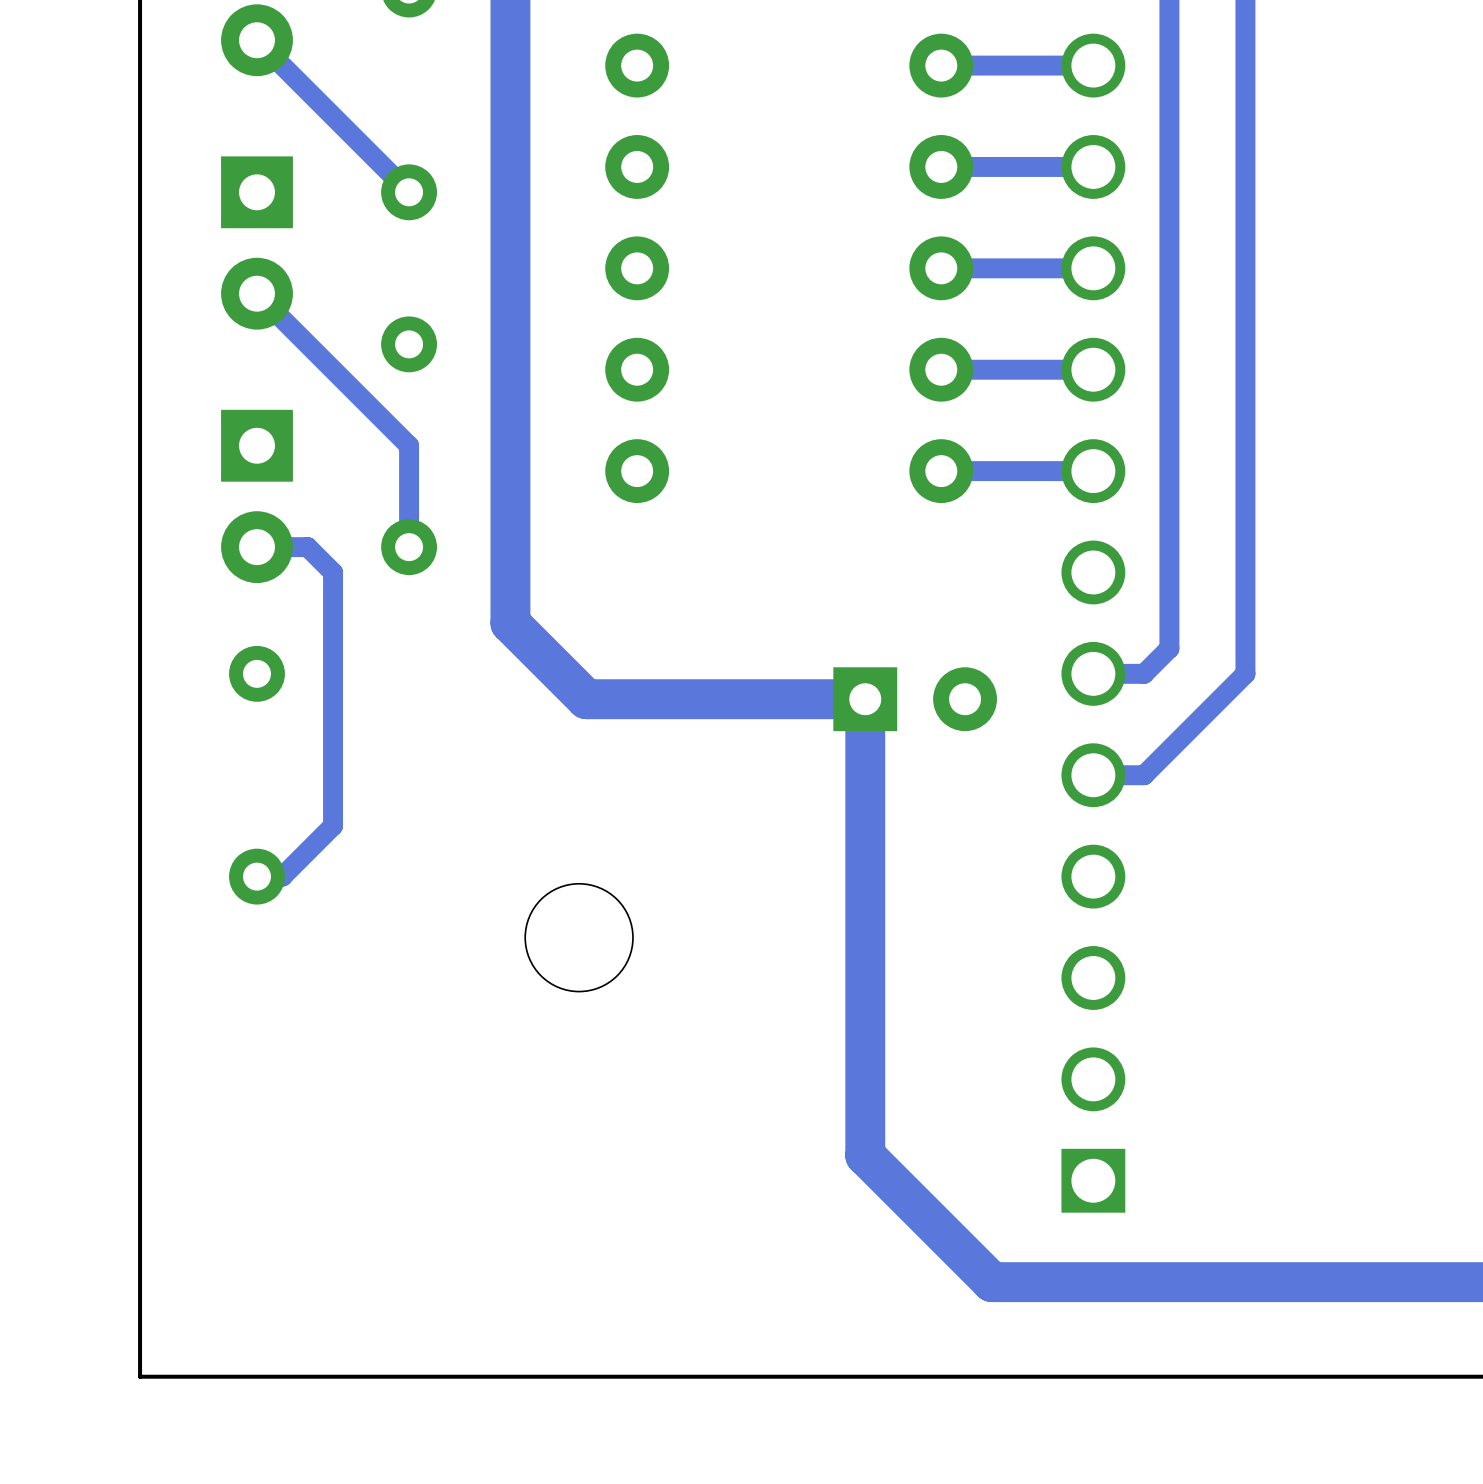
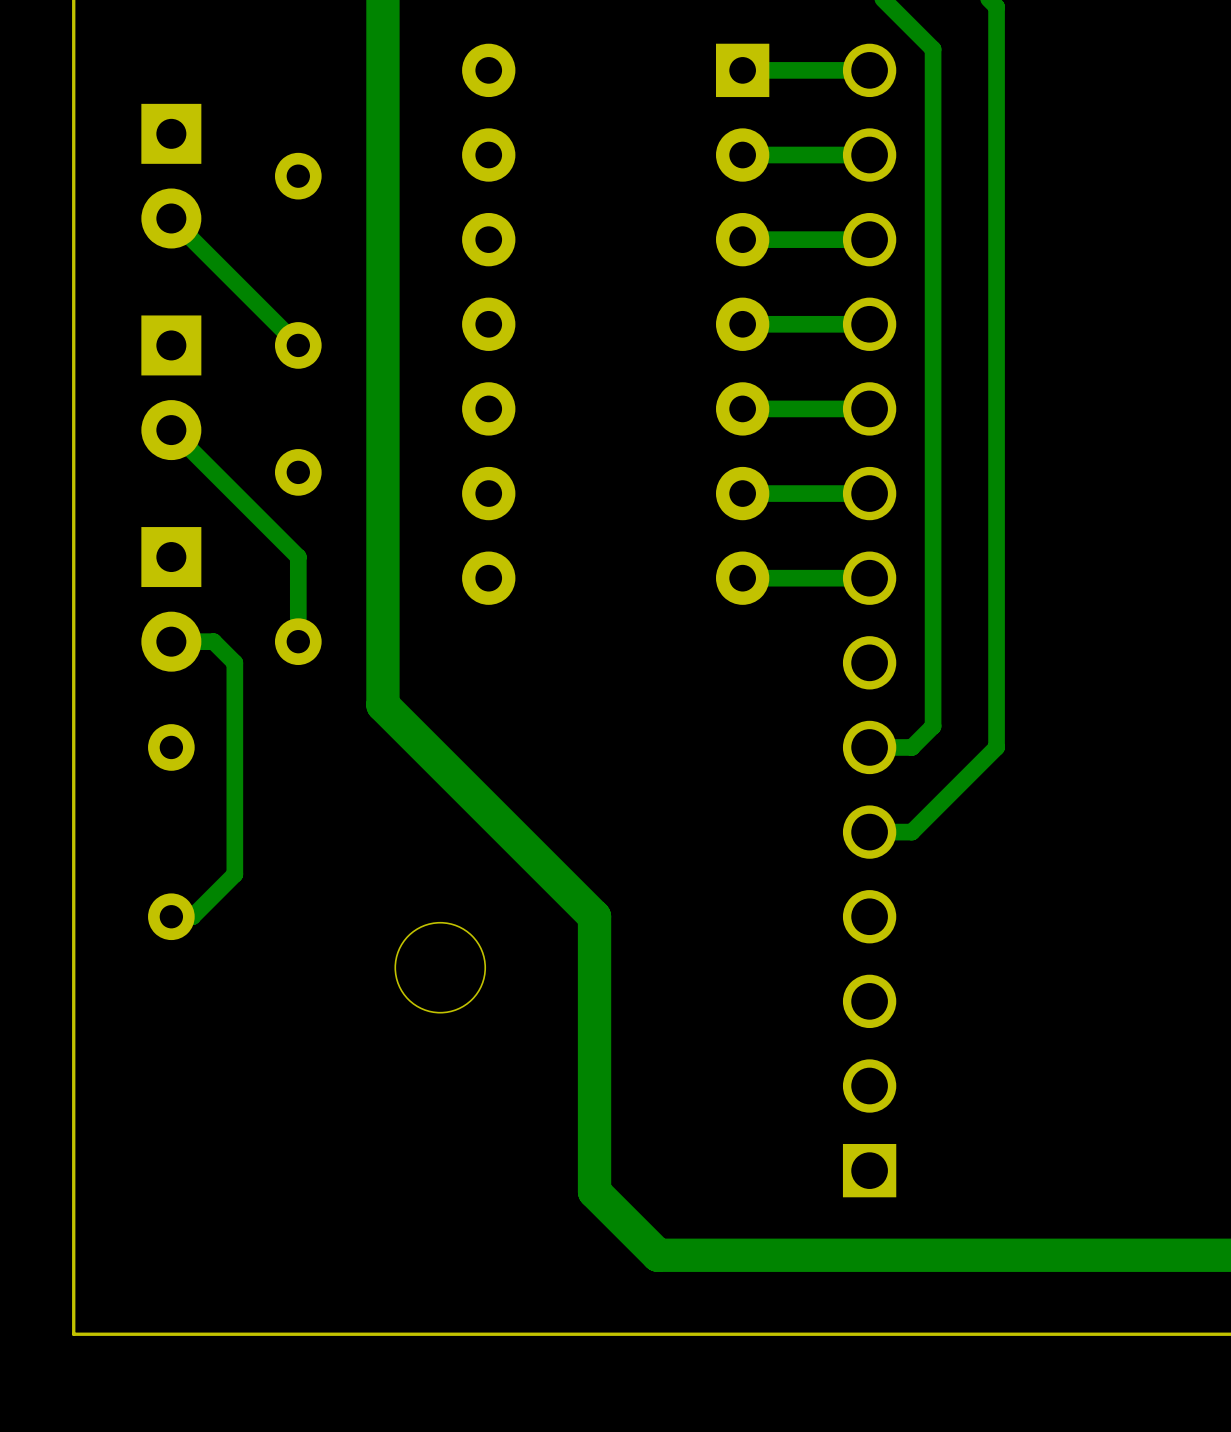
track: (586, 699) (865, 699) (865, 1155) (991, 1282) -> (446, 768) (594, 916) (594, 1191) (658, 1255) (784, 1255)
part: (915, 699) -> none

